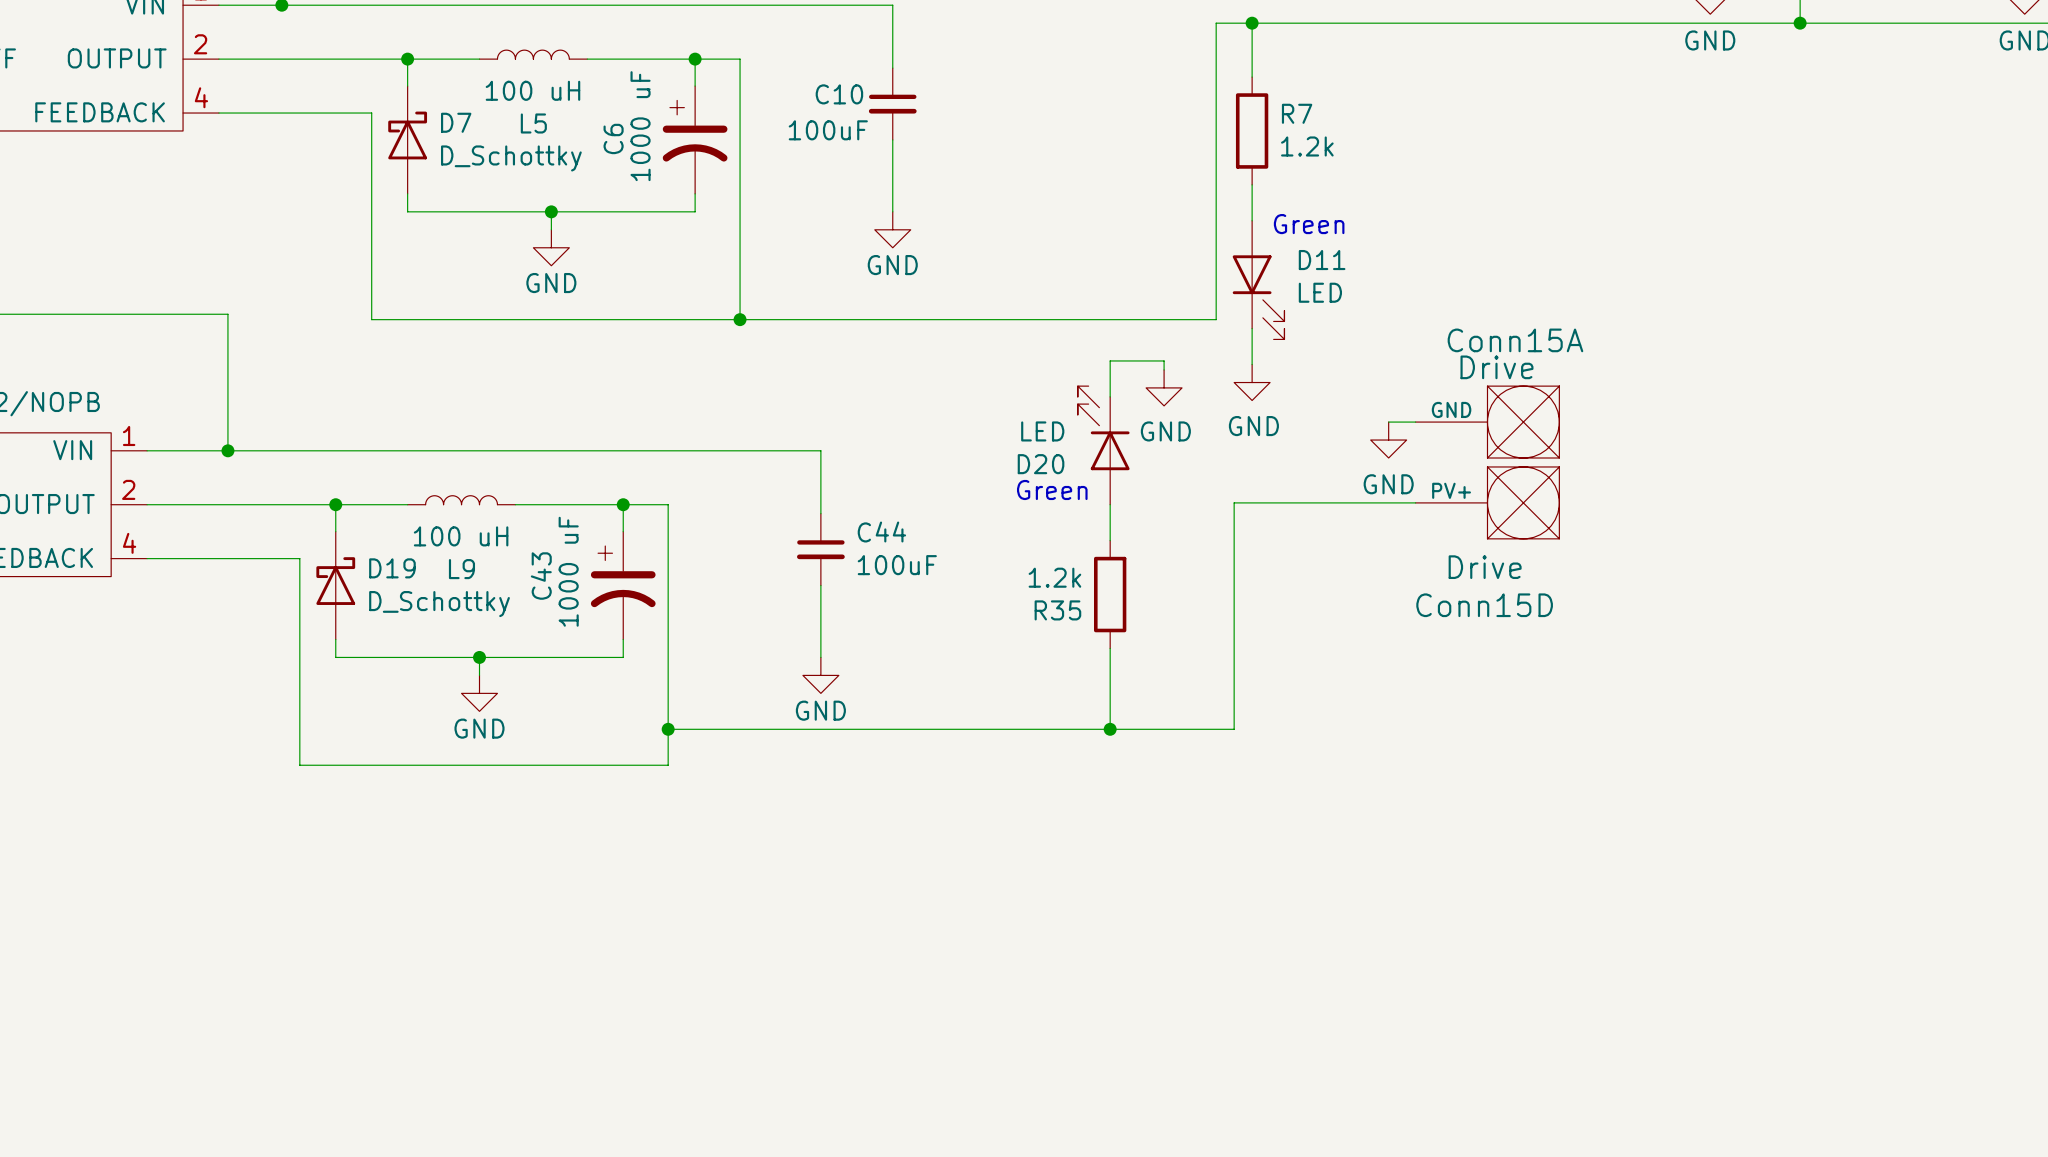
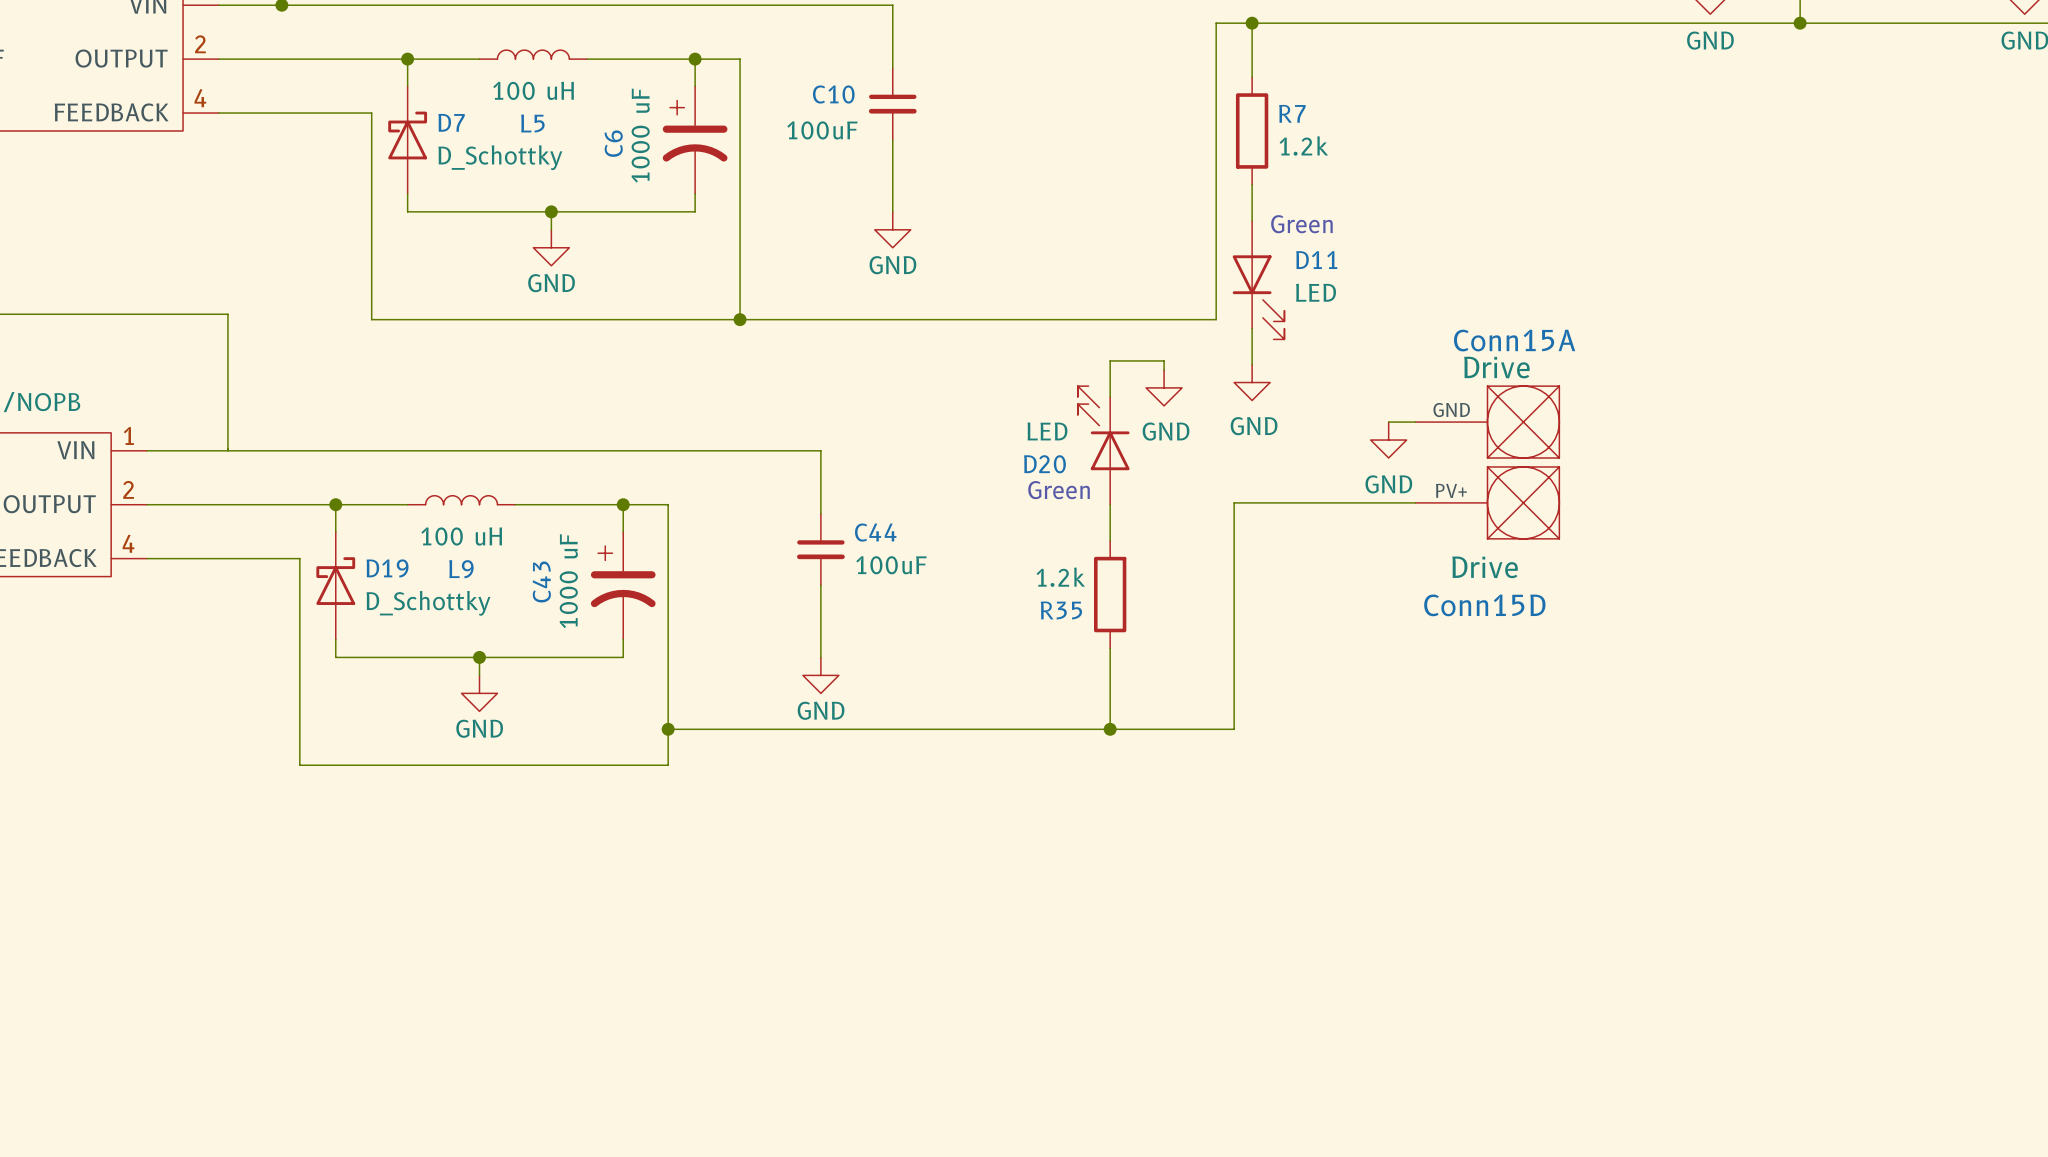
junction: (227, 450) -> none

